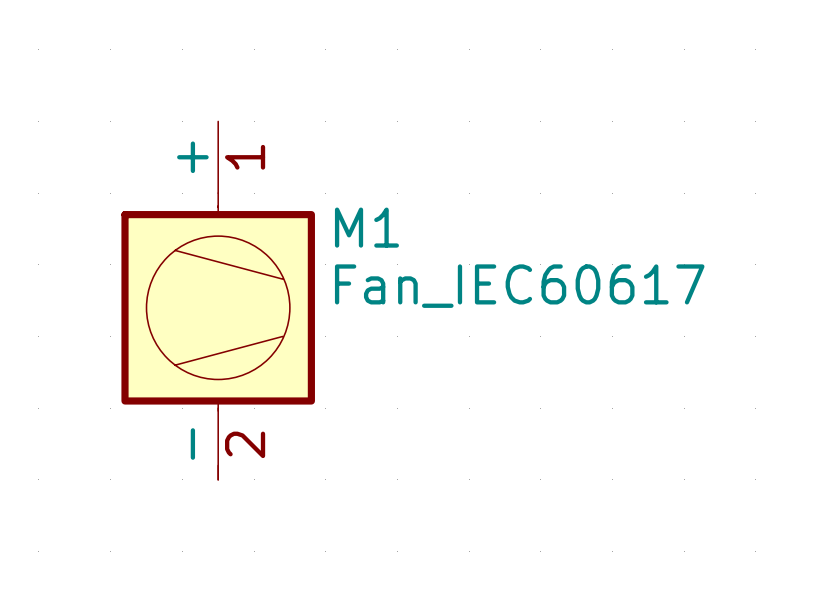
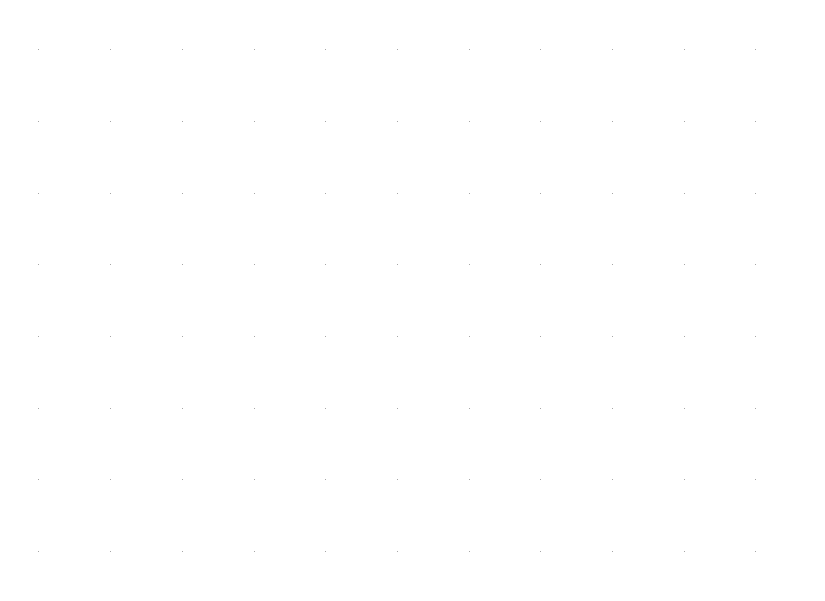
M1: Fan_IEC60617 (218, 300) -> none

